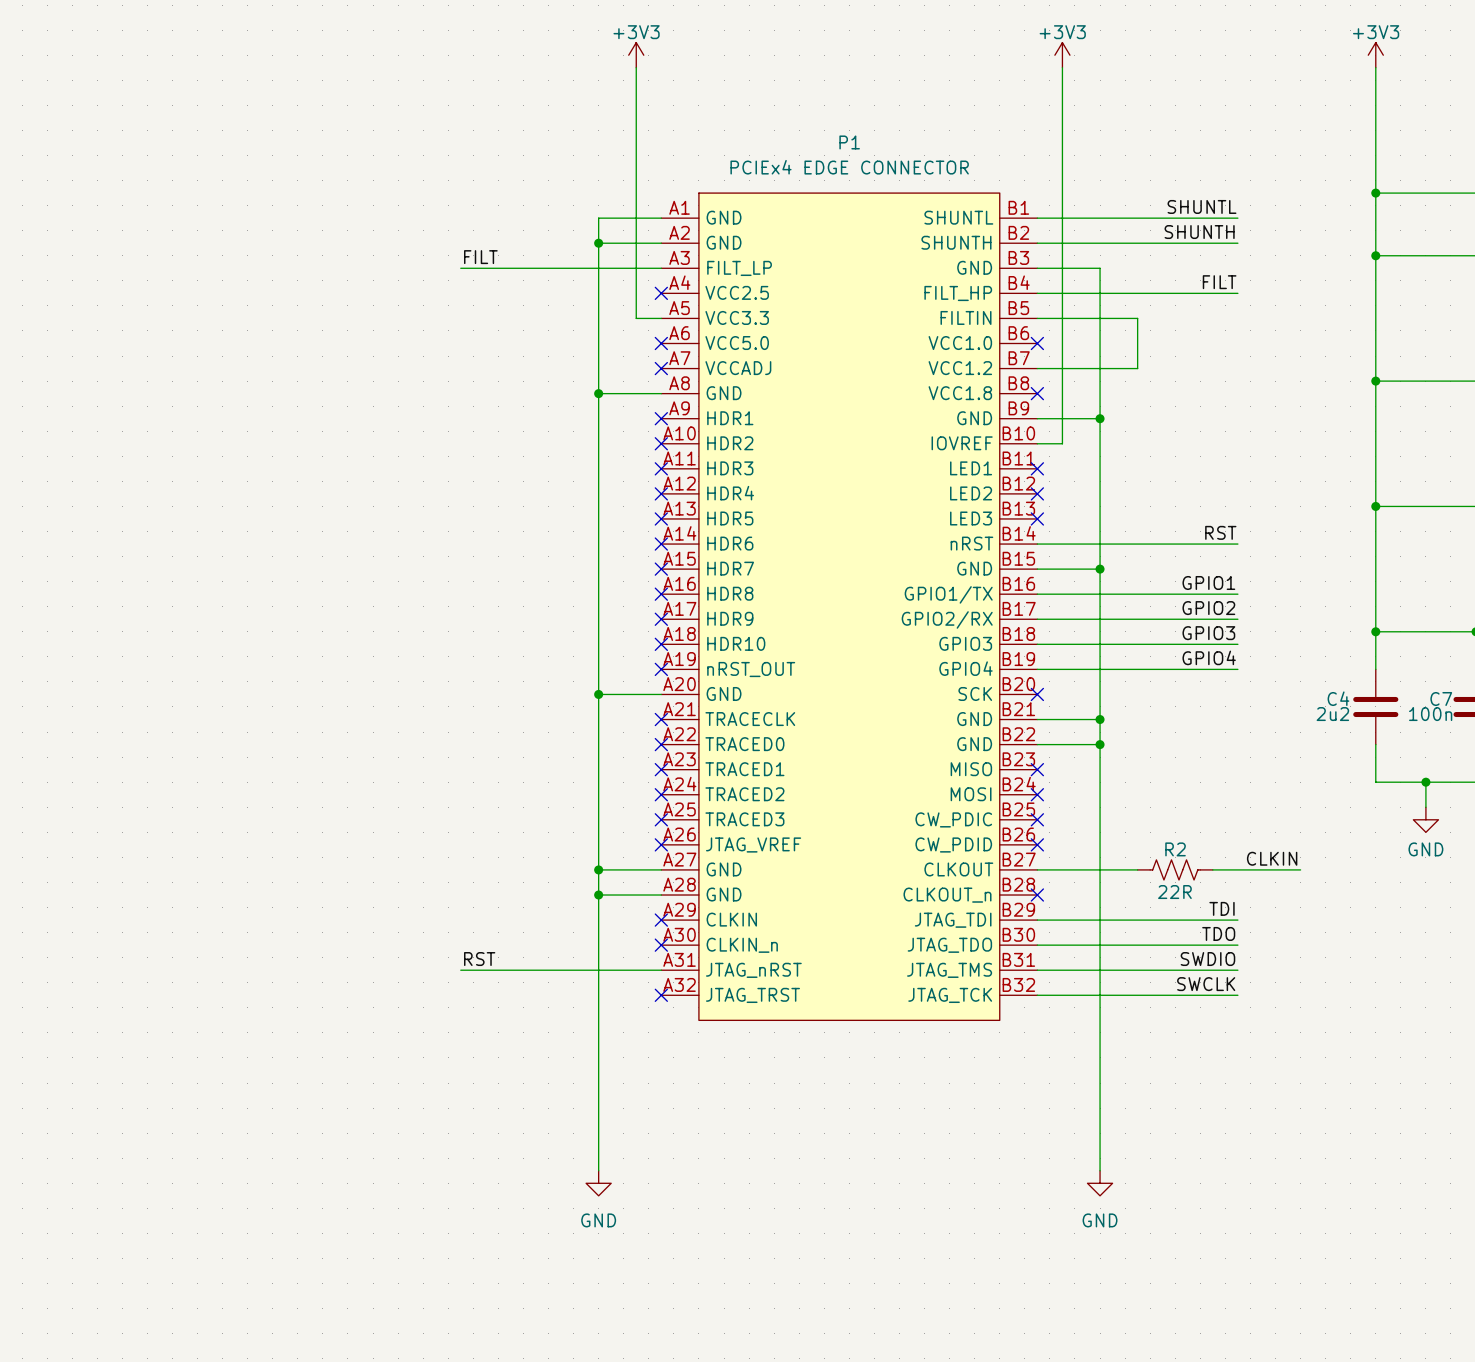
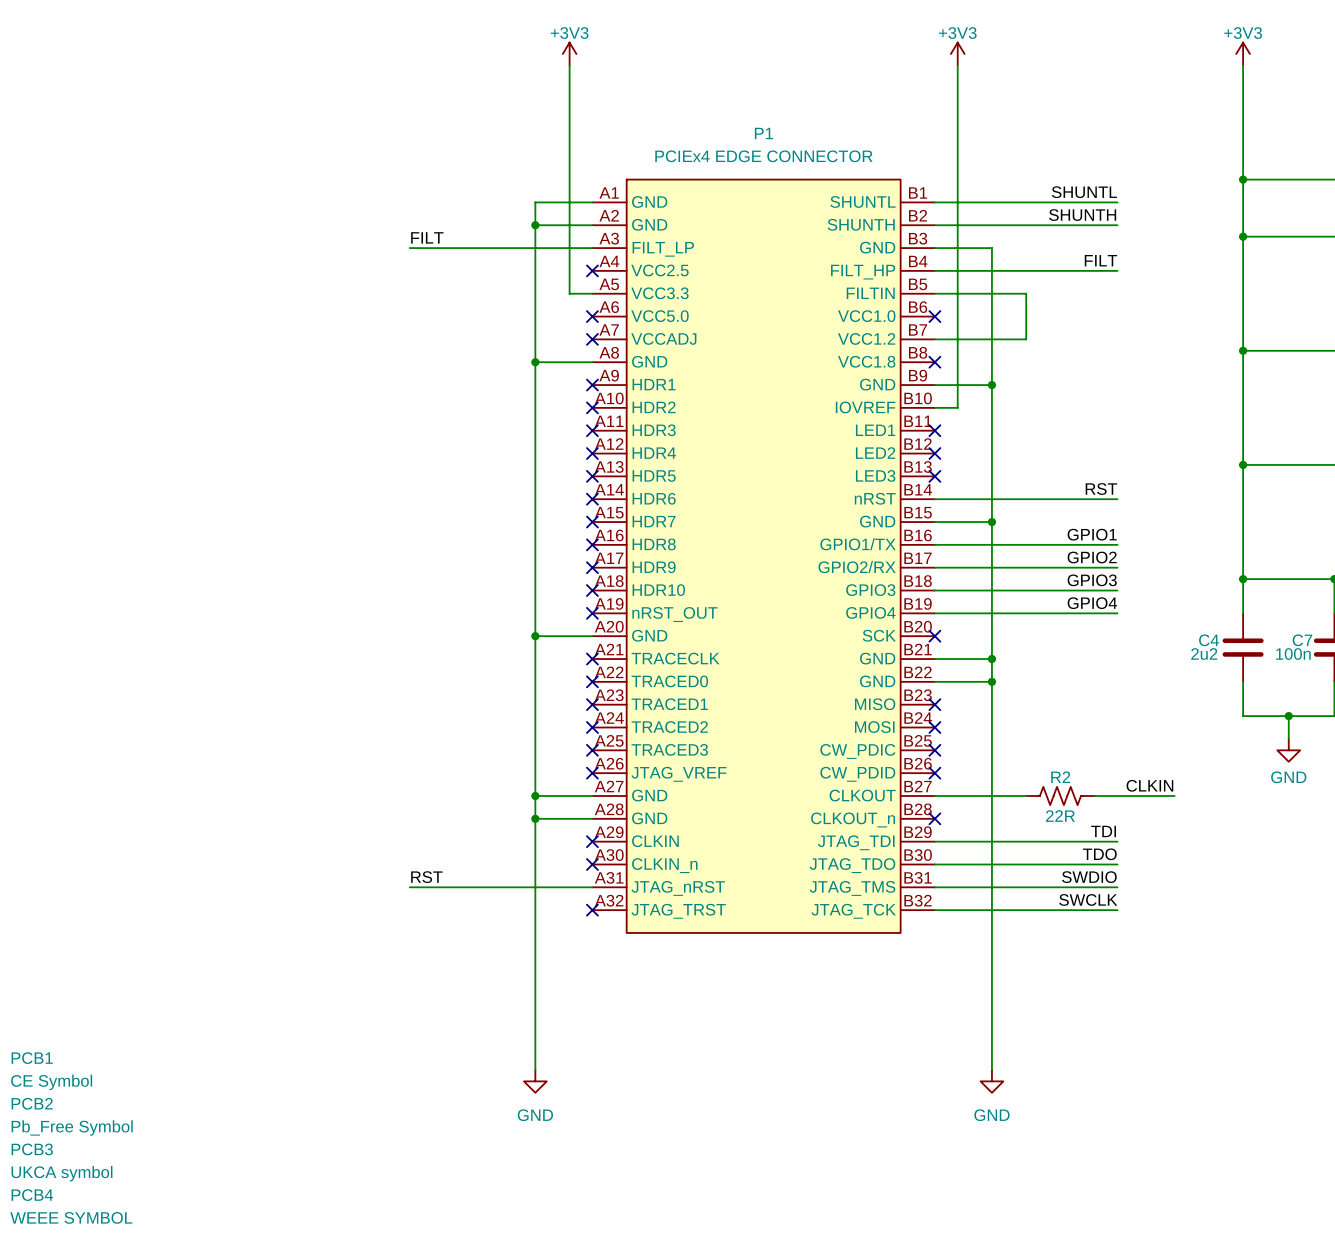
PCB1: none -> CE Symbol (51, 1071)
PCB2: none -> Pb_Free Symbol (72, 1116)
PCB3: none -> UKCA symbol (61, 1162)
PCB4: none -> WEEE SYMBOL (71, 1206)

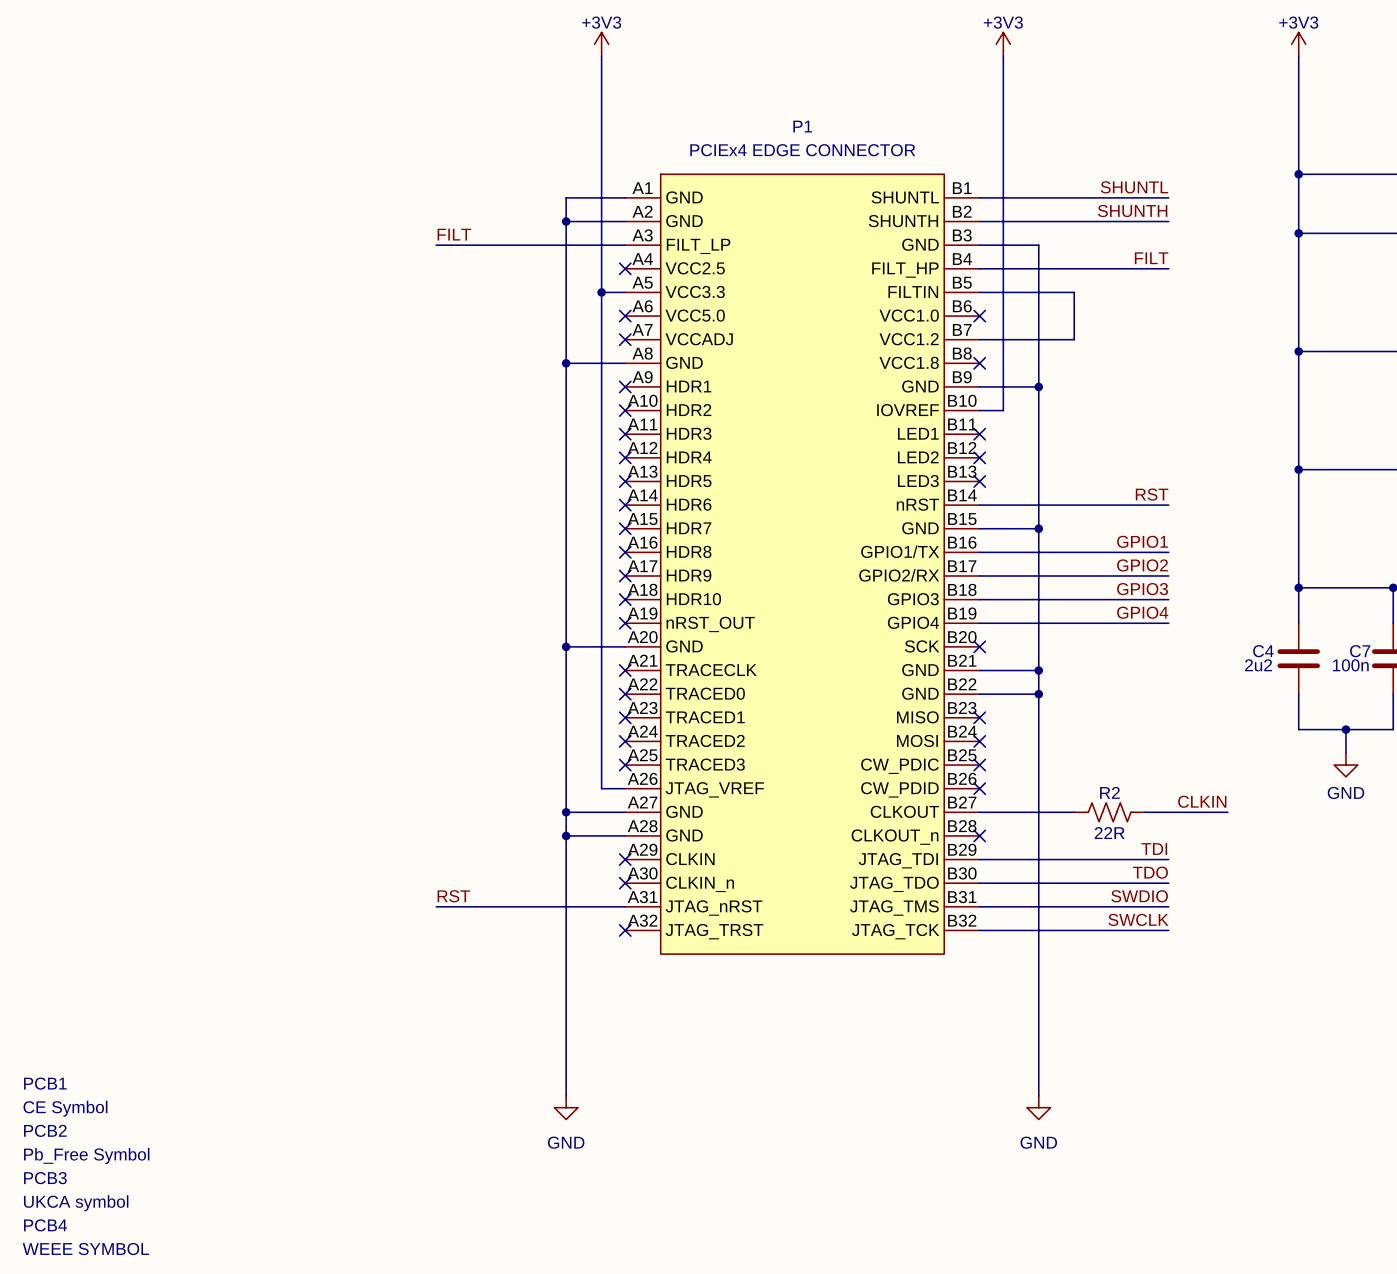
wire: none -> (601, 292) (601, 788) (625, 788)
junction: none -> (601, 292)
no-connect mark: (592, 773) -> none

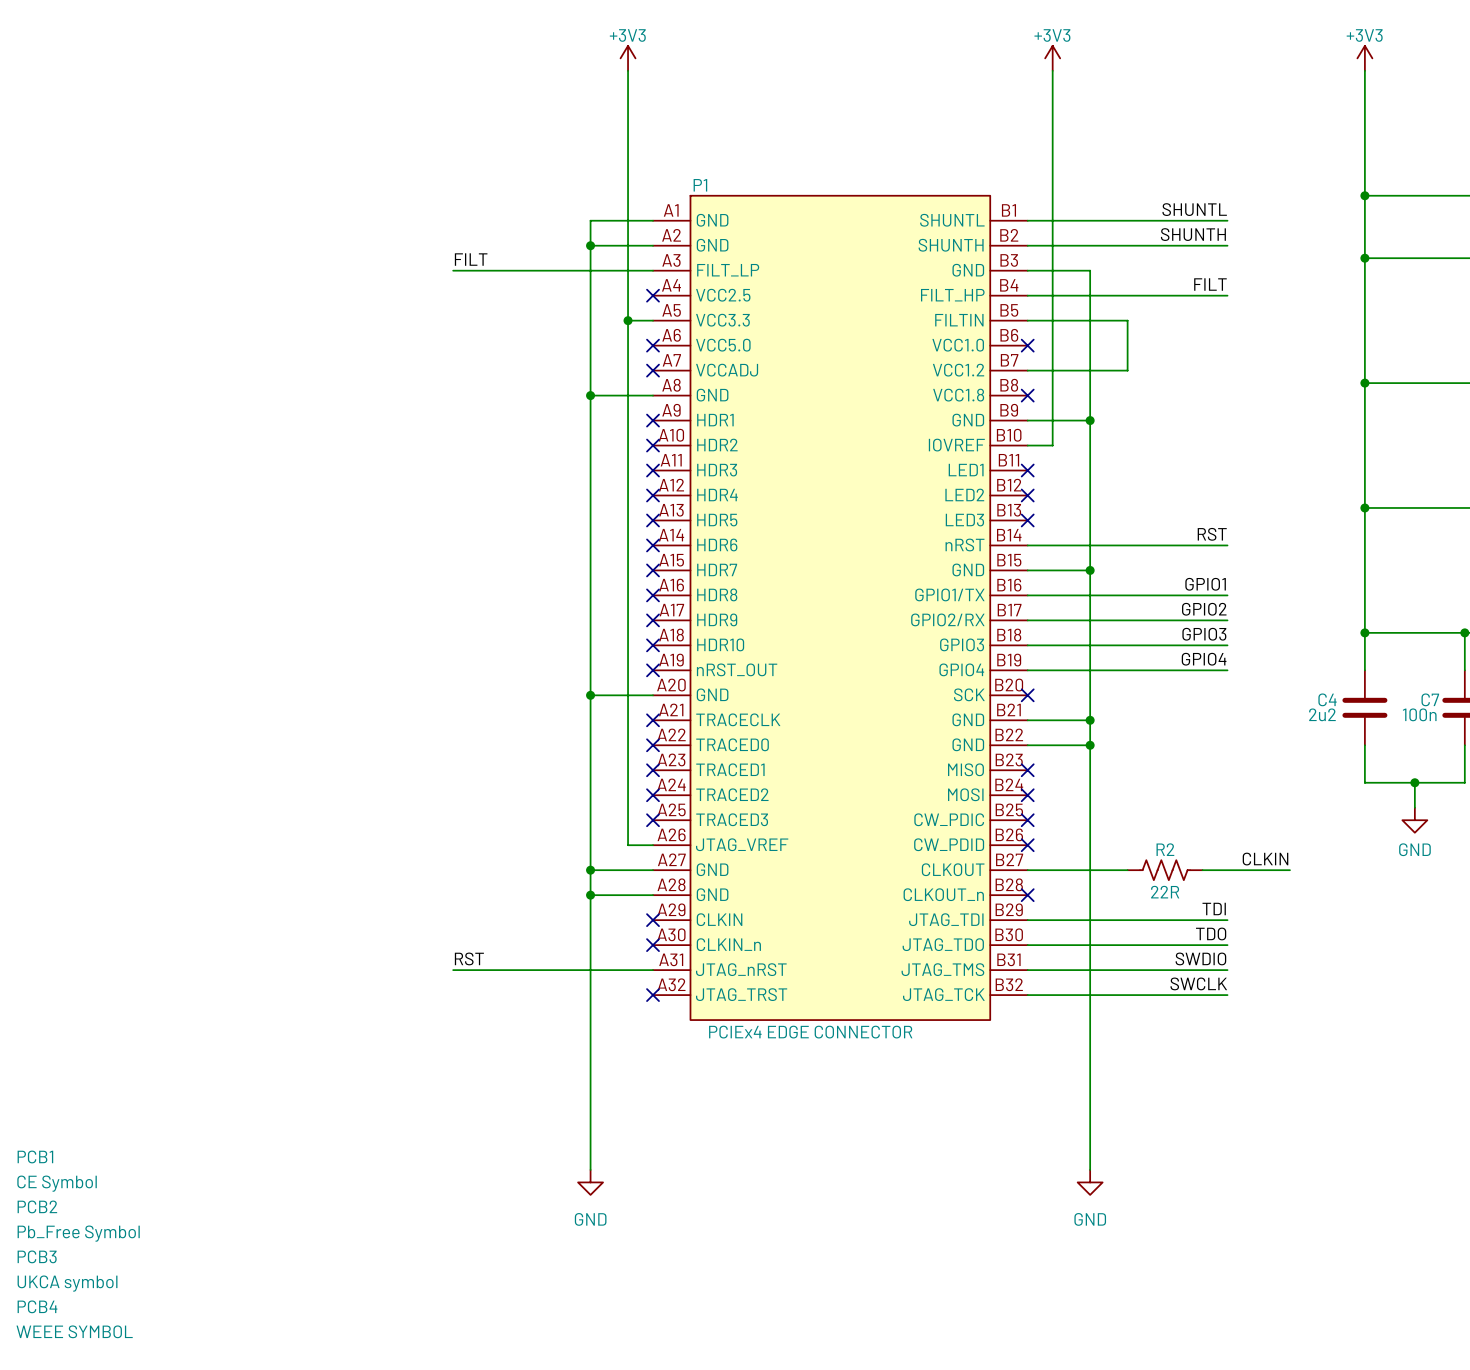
P1 name position: P1 (802, 126) -> P1 (700, 185)
P1 value position: PCIEx4 EDGE CONNECTOR (802, 150) -> PCIEx4 EDGE CONNECTOR (810, 1032)

